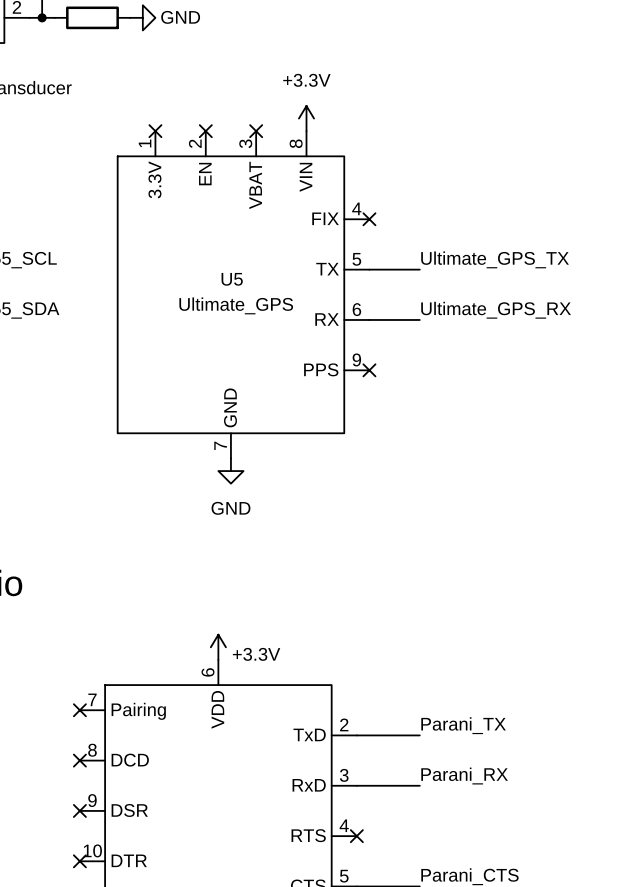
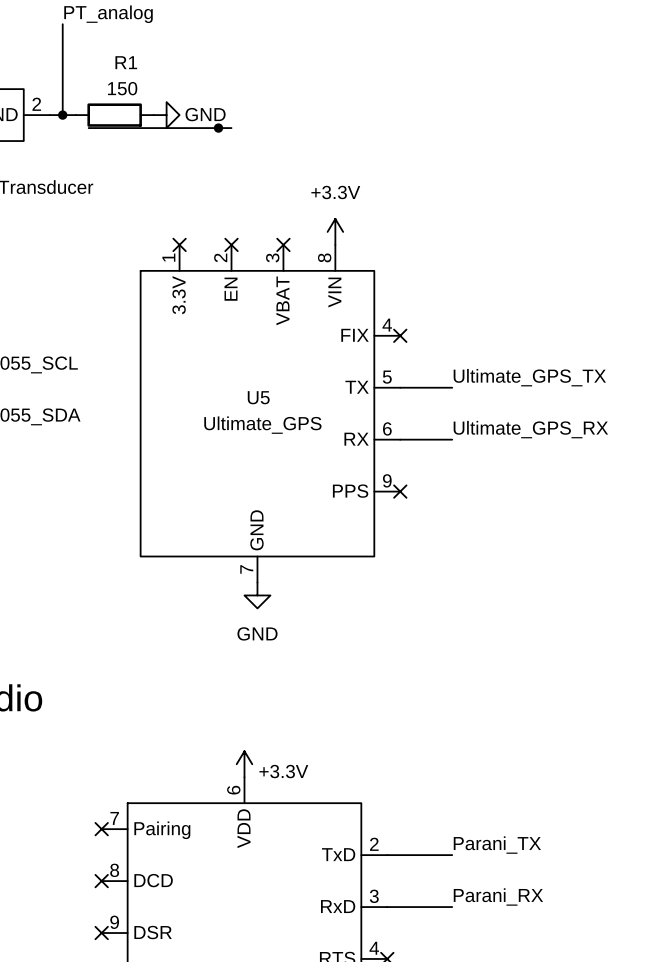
wire: none -> (88, 128) (231, 128)
junction: none -> (218, 128)
power symbol position: +3.3V (306, 118) -> +3.3V (335, 231)
no-connect mark position: (155, 131) -> (179, 244)
no-connect mark position: (205, 131) -> (231, 244)
no-connect mark position: (256, 131) -> (283, 244)
no-connect mark position: (369, 219) -> (400, 335)
label position: Ultimate_GPS_TX (495, 259) -> Ultimate_GPS_TX (529, 377)
wire: (369, 269) (419, 269) -> (400, 387) (452, 387)
U5 position: (243, 294) -> (270, 413)
label position: Ultimate_GPS_RX (496, 310) -> Ultimate_GPS_RX (530, 429)
wire: (369, 319) (419, 319) -> (400, 439) (452, 439)
no-connect mark position: (369, 370) -> (400, 491)
power symbol position: GND (230, 471) -> GND (257, 595)

